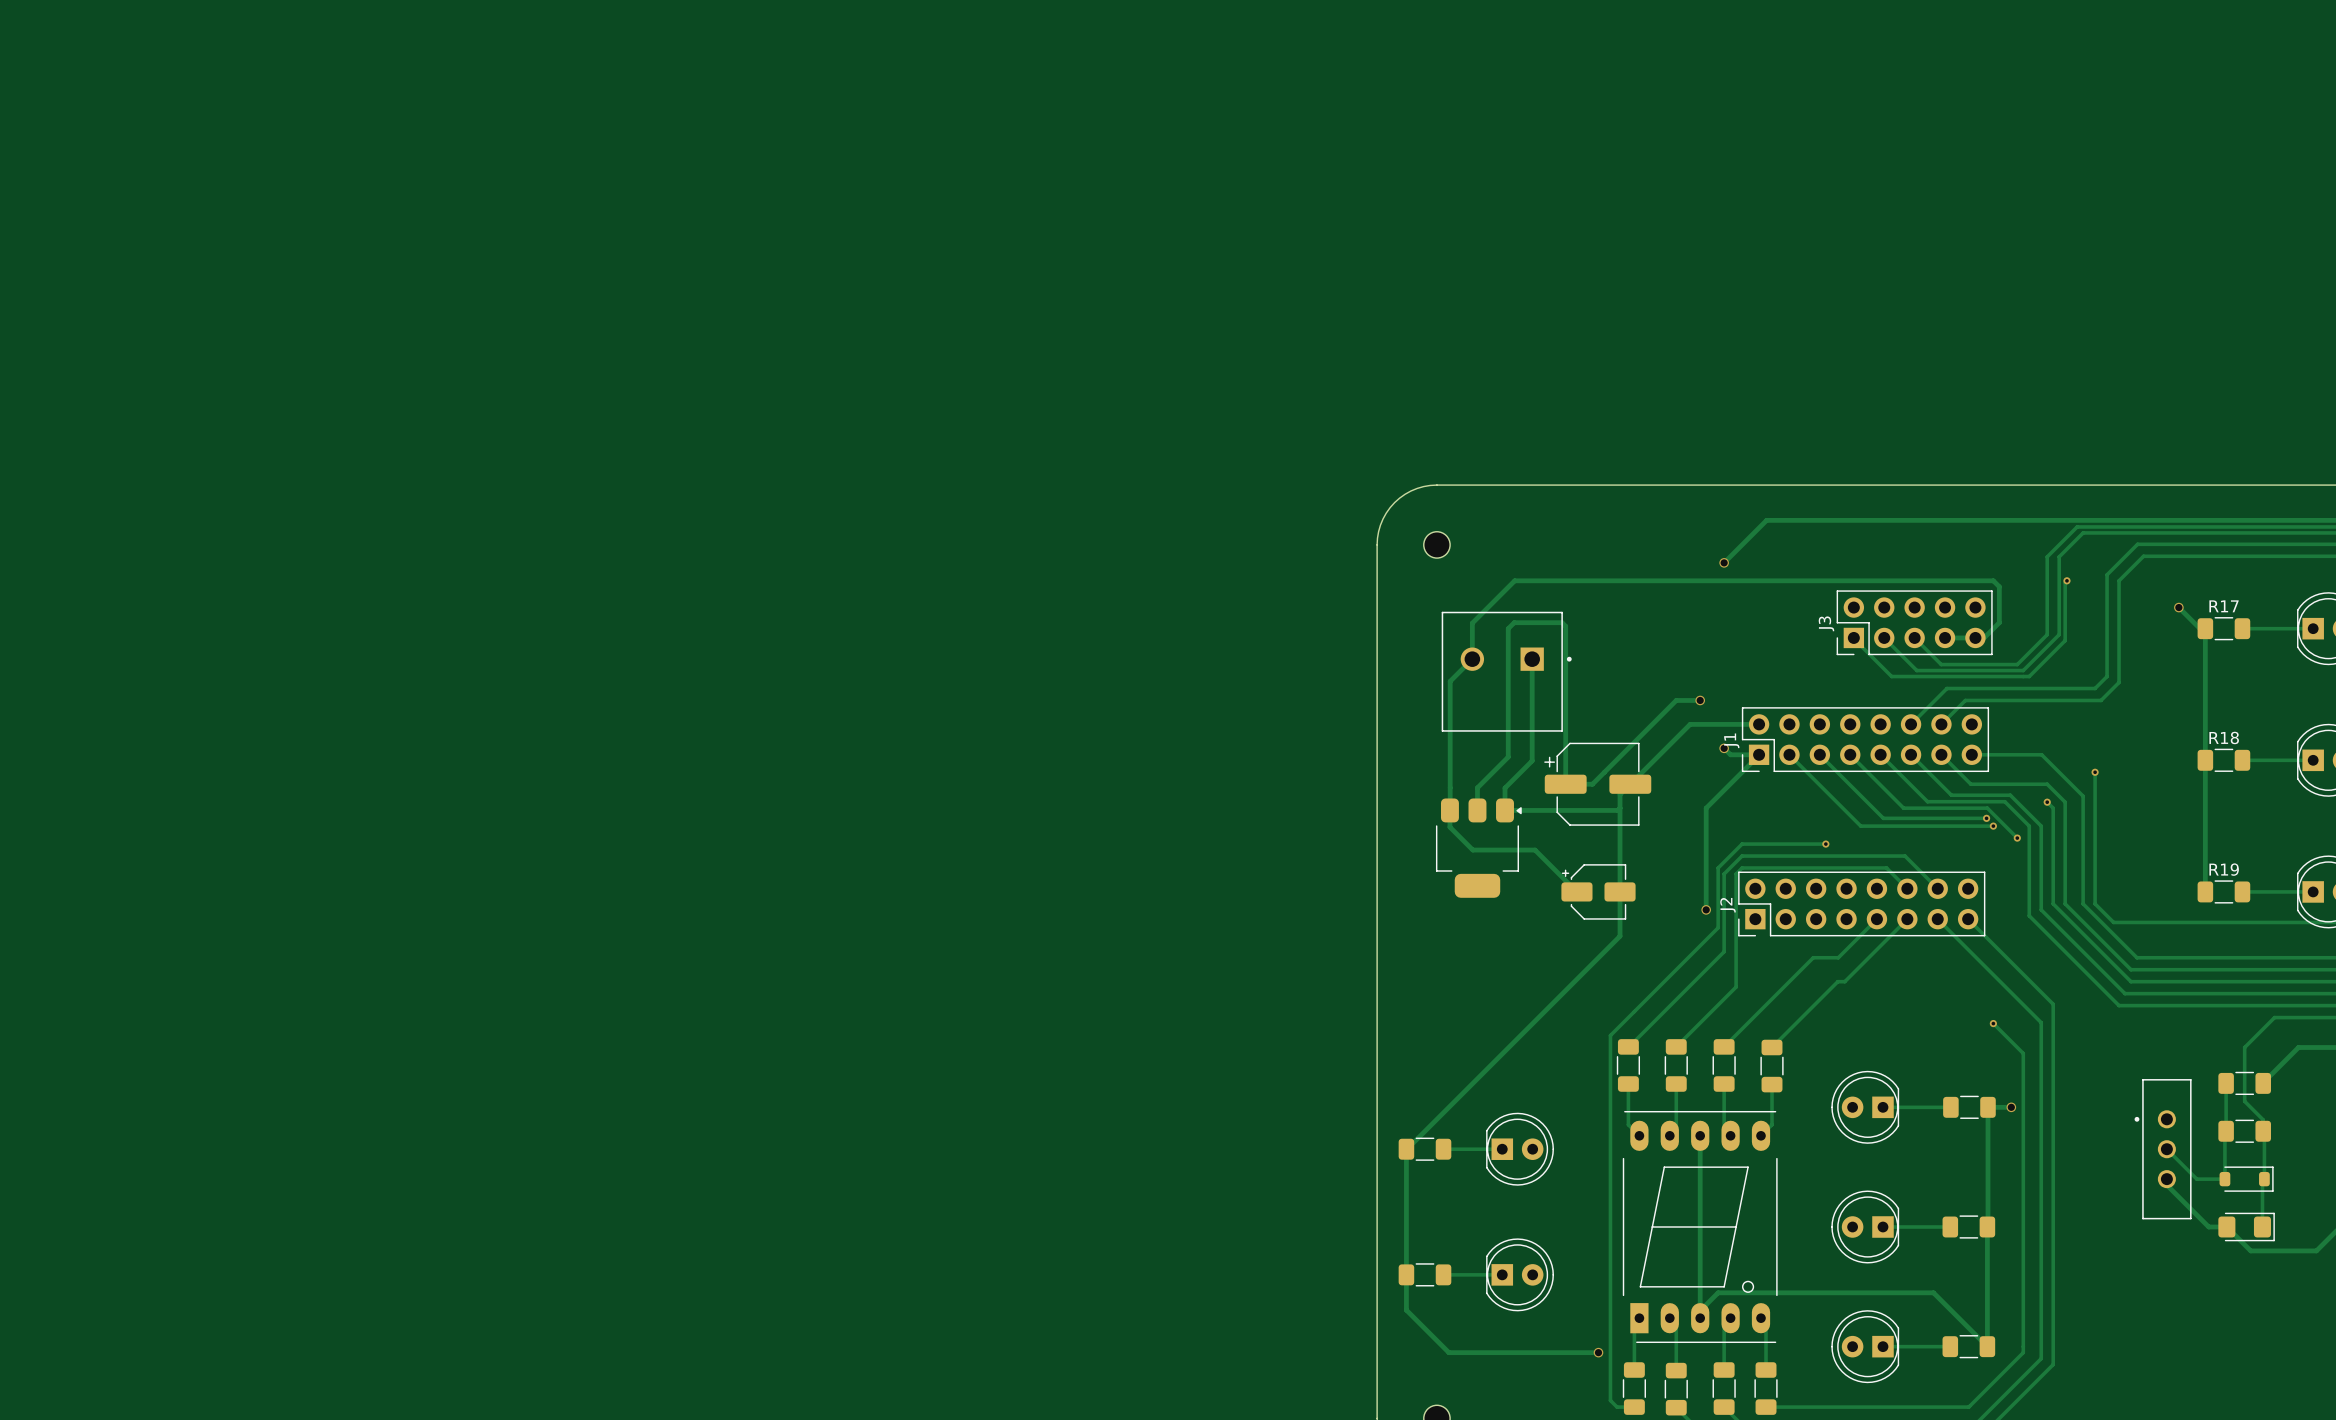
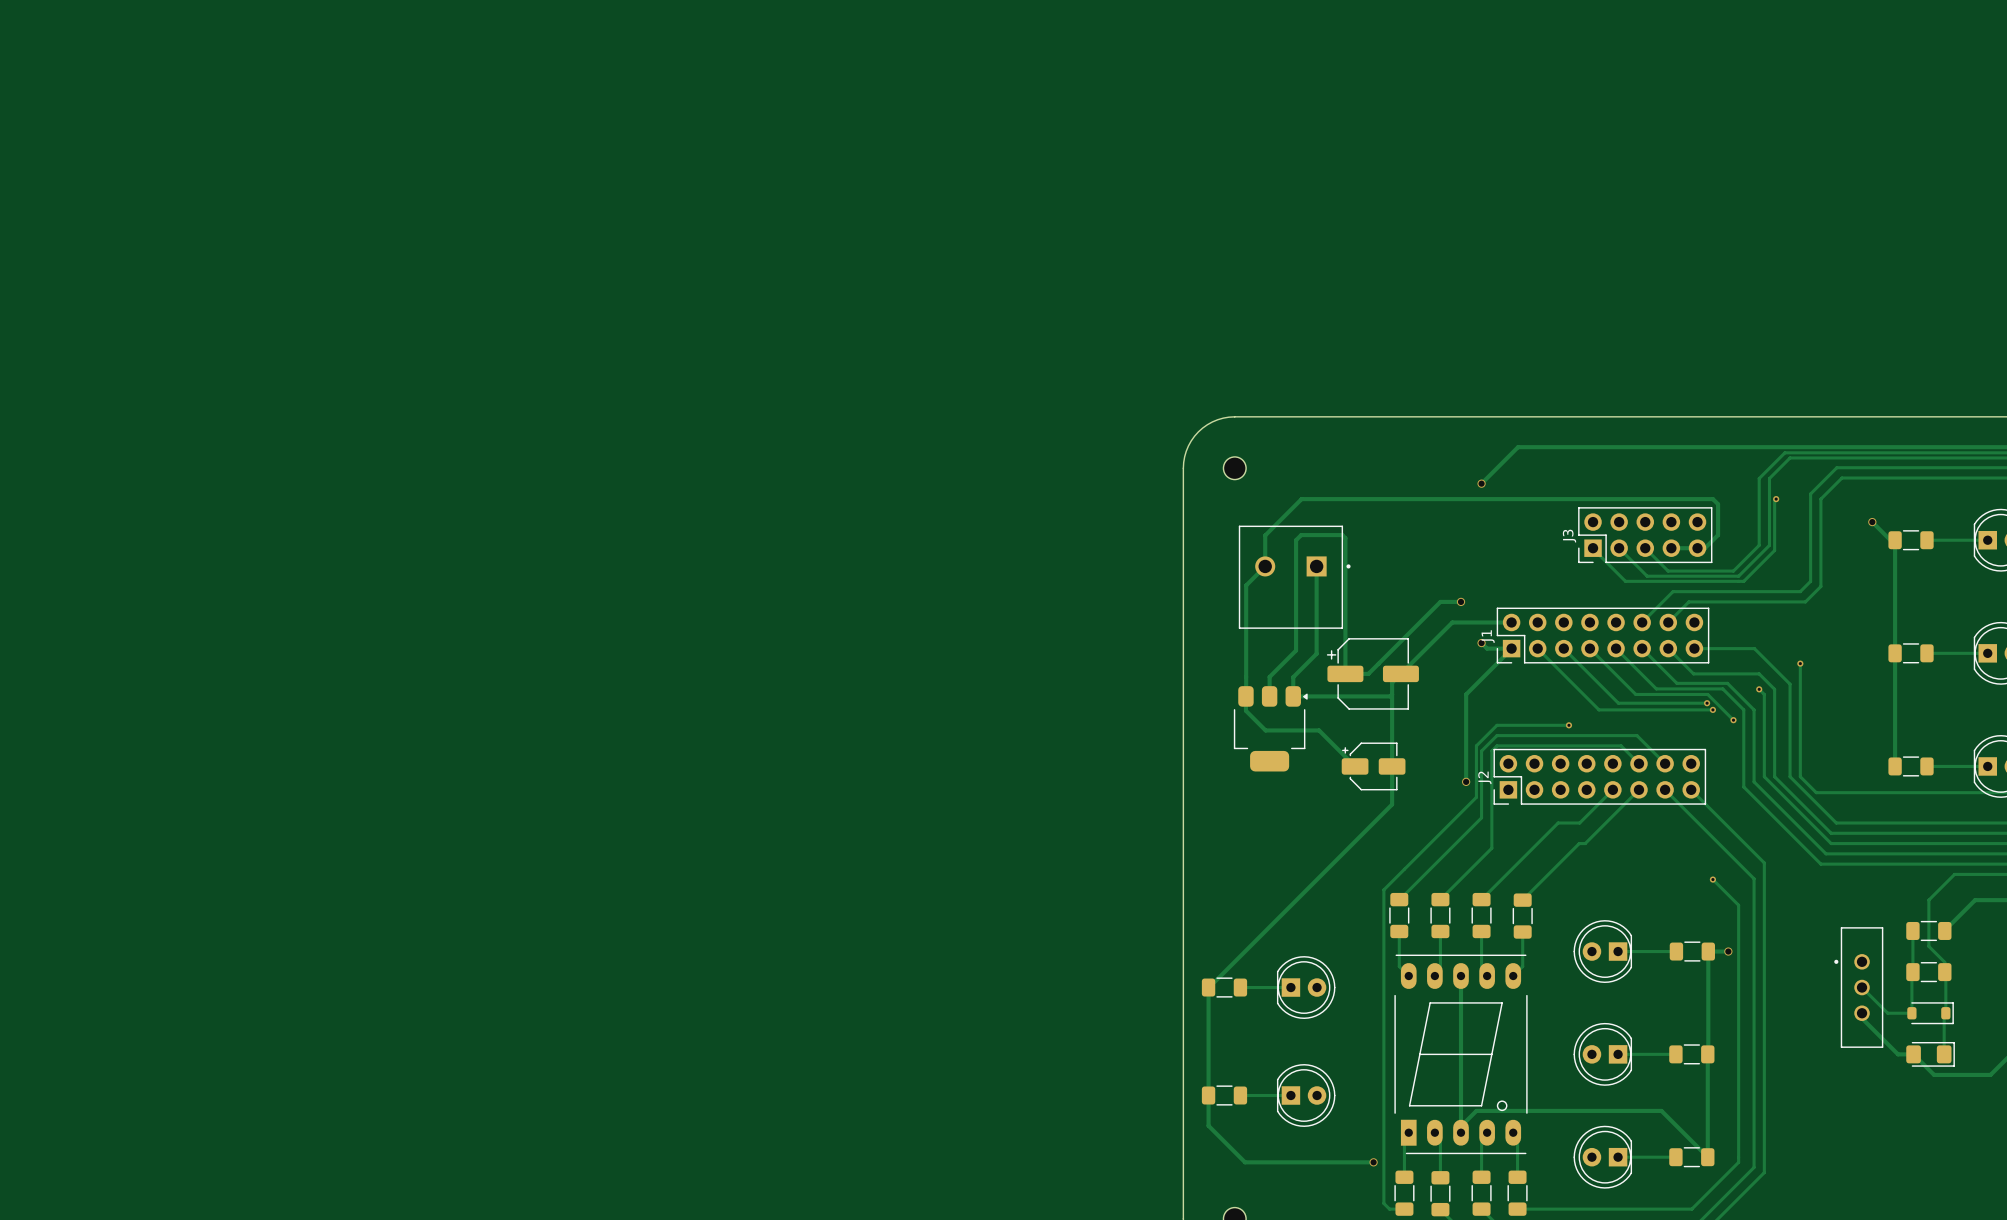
R17 name: R17 (2224, 606) -> none
R18 name: R18 (2224, 737) -> none
R19 name: R19 (2224, 869) -> none

